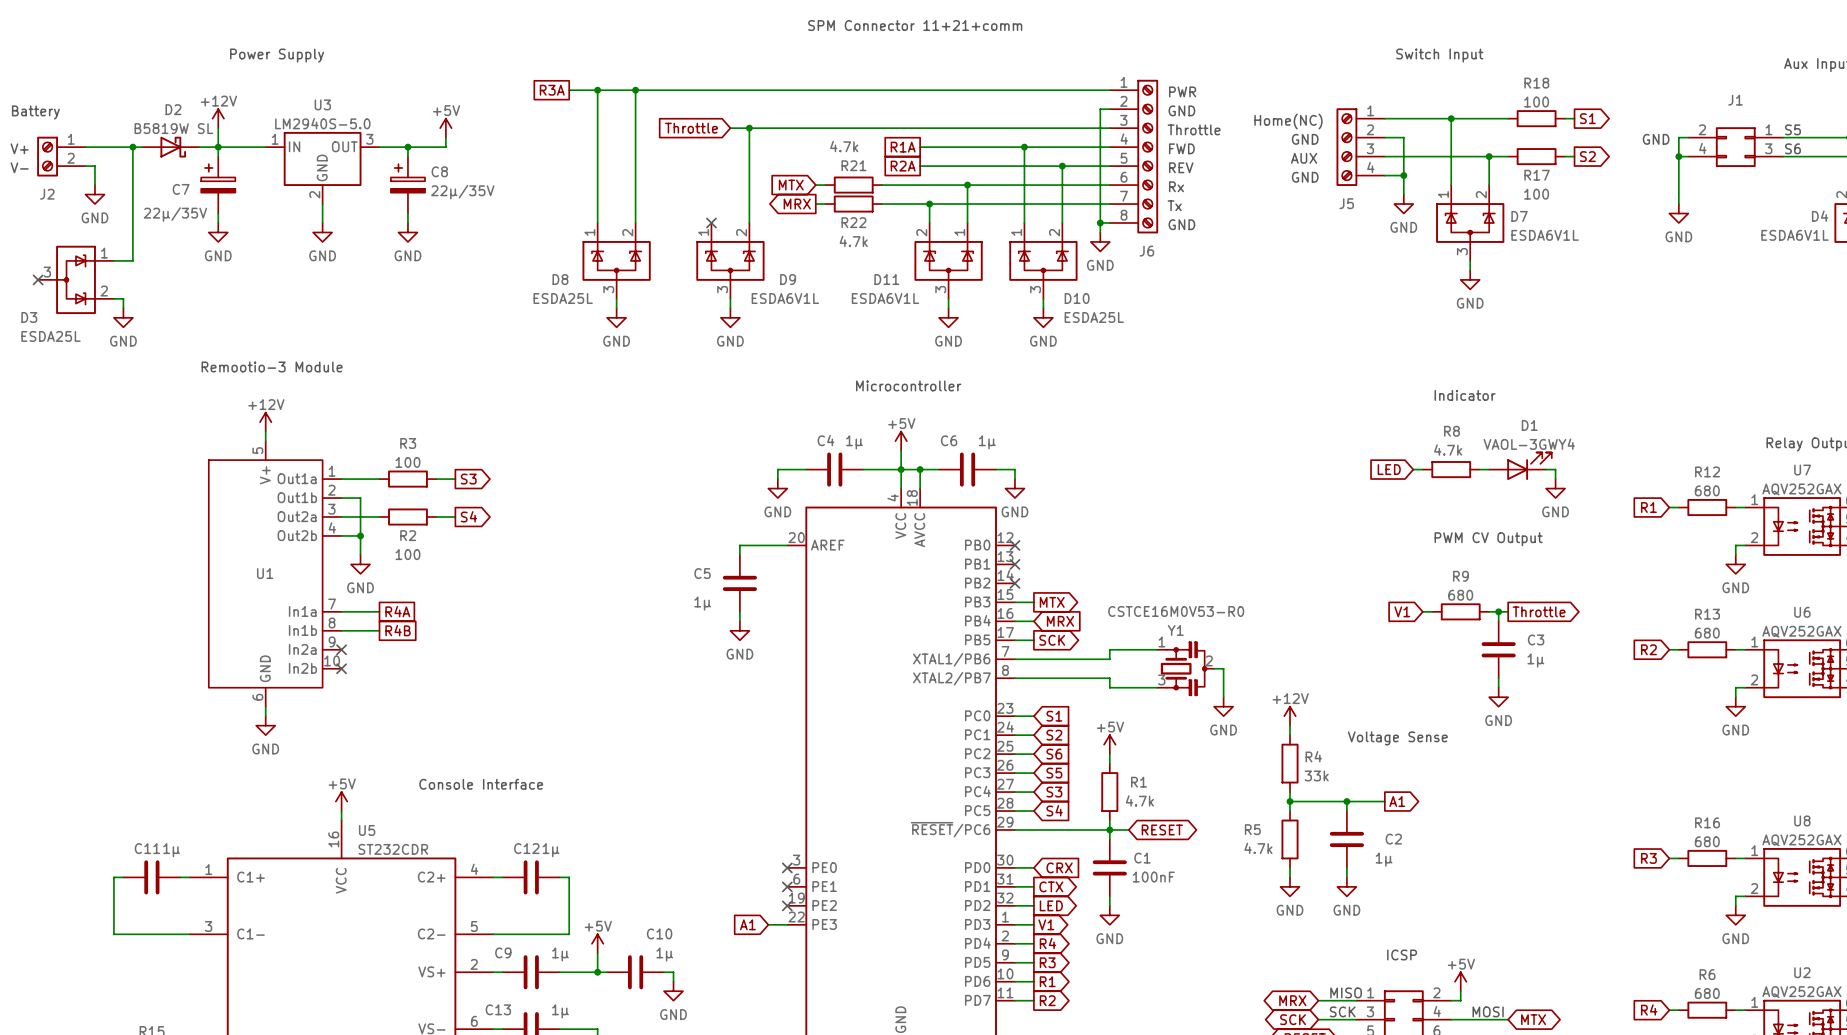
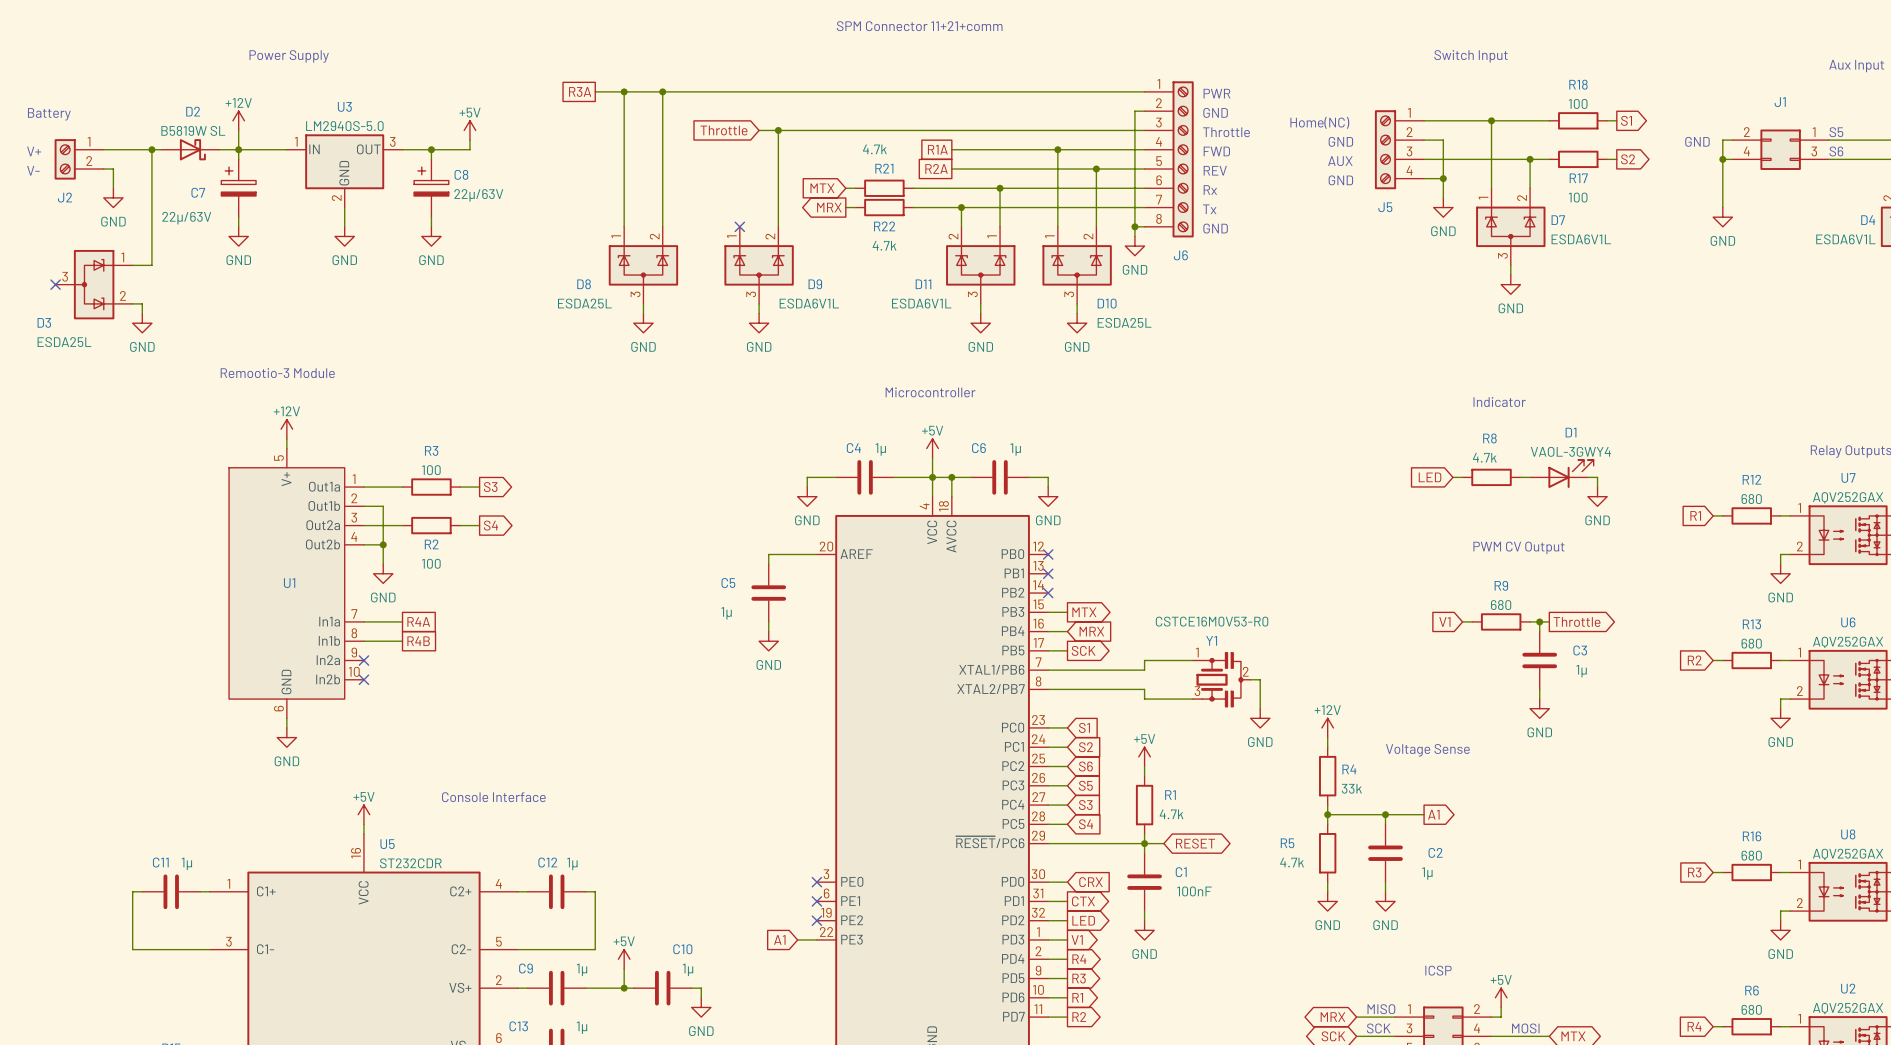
C8 value: 22µ/35V (462, 192) -> 22µ/63V (478, 195)
C7 value: 22µ/35V (175, 214) -> 22µ/63V (186, 218)

